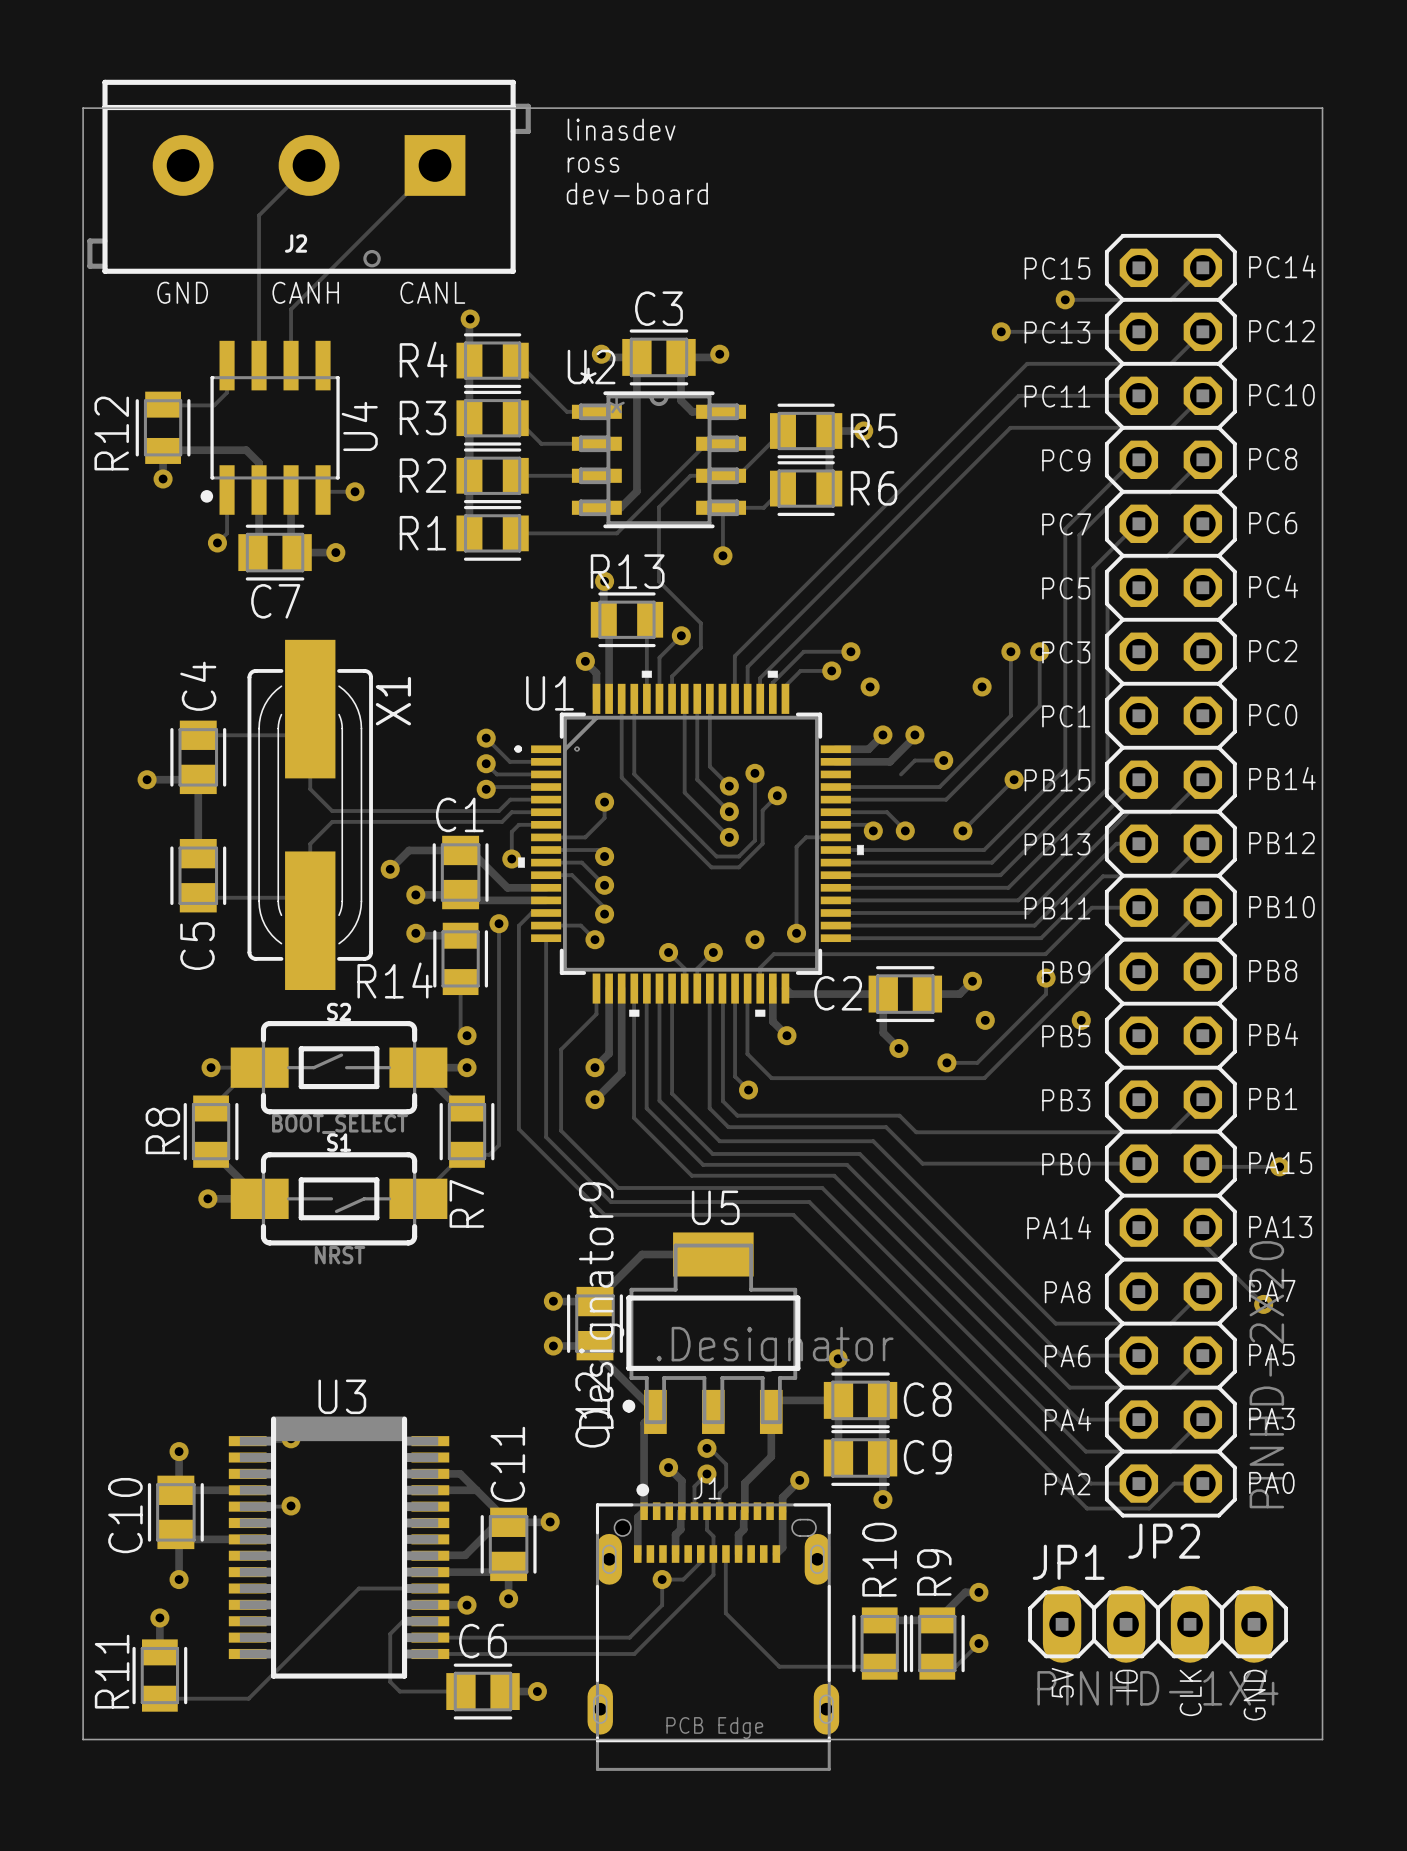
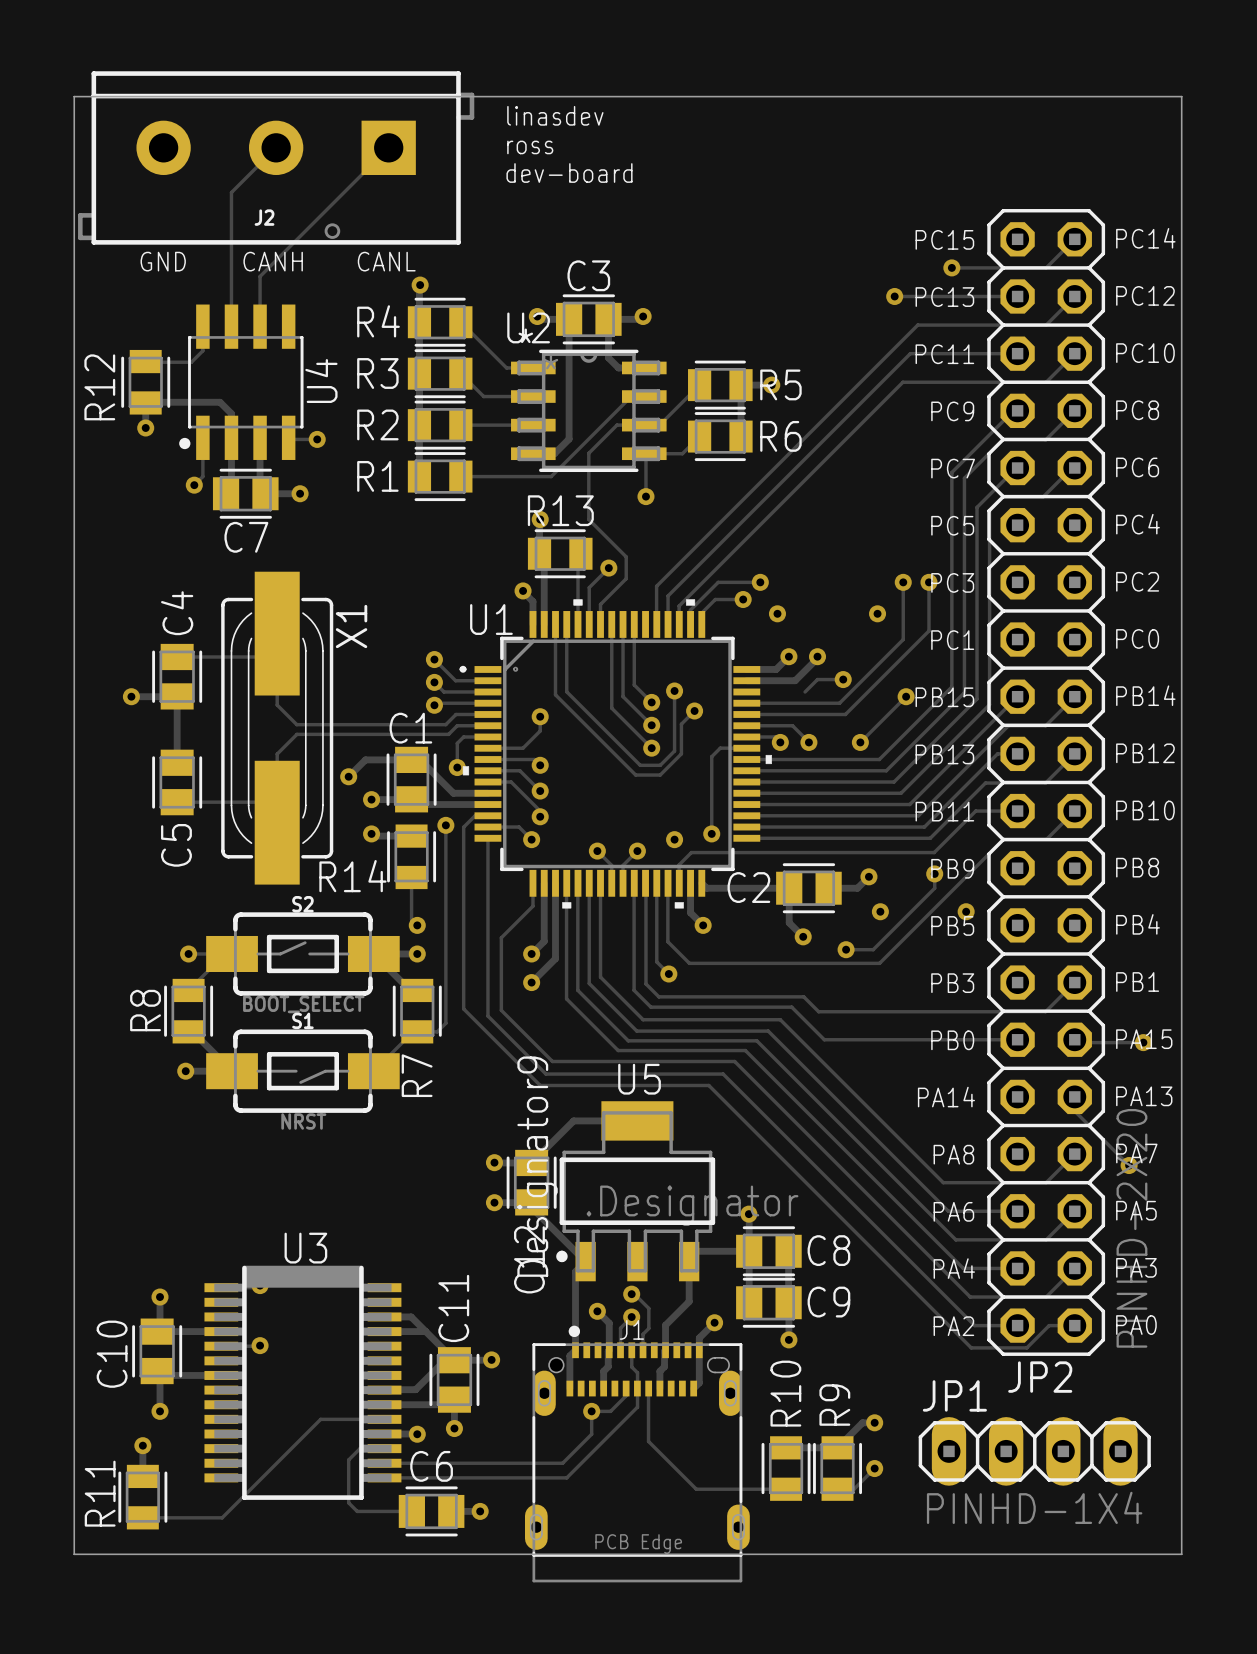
text: IO (1126, 1680) -> none
text: 5V (1062, 1682) -> none
text: CLK (1190, 1692) -> none
text: GND (1254, 1695) -> none

